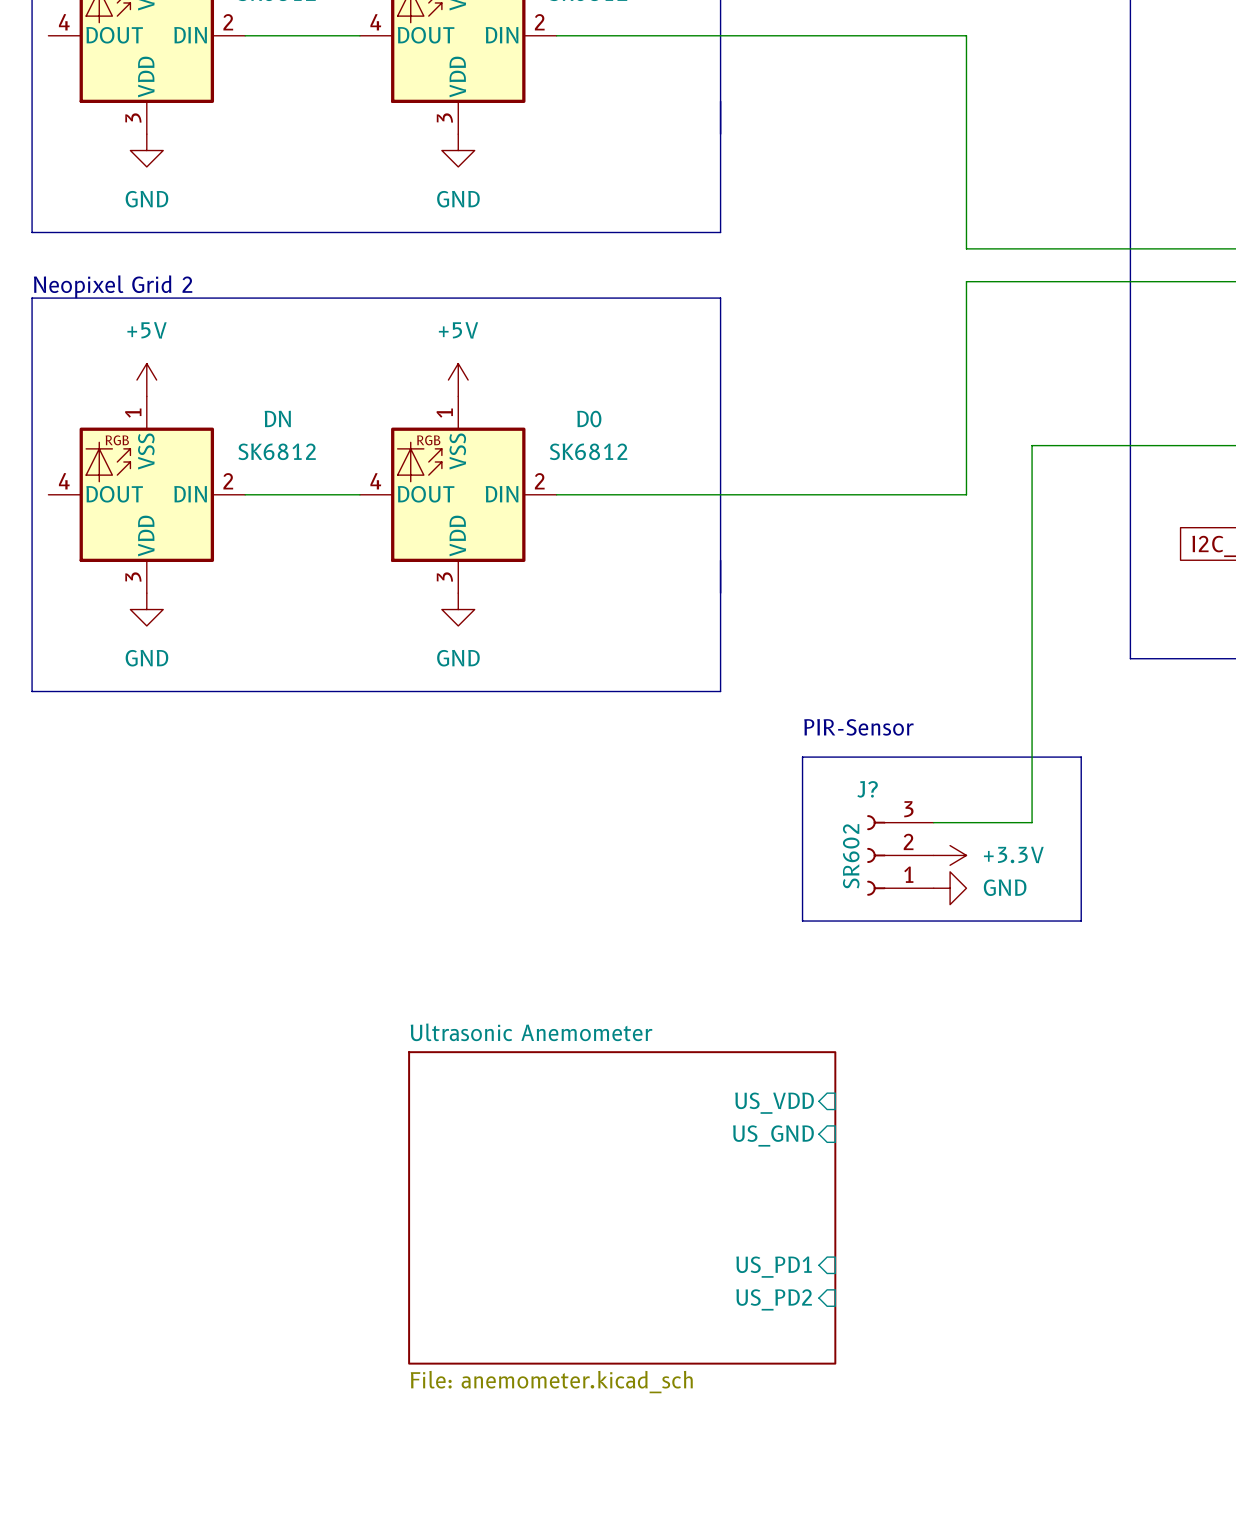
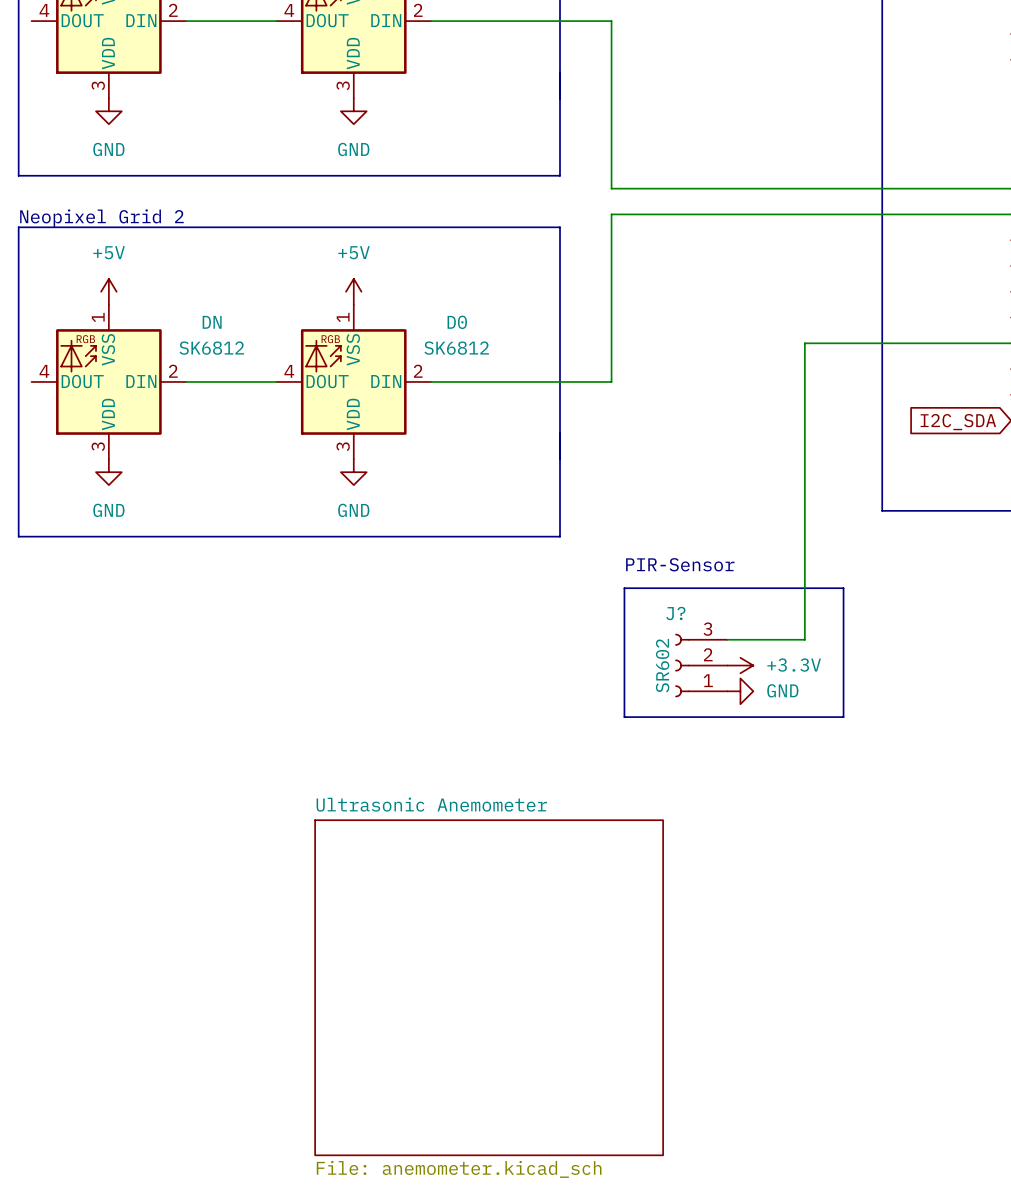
wire: (786, 35) (966, 35) (966, 248) -> (611, 21) (611, 188) (753, 188)
wire: (966, 281) (966, 494) (786, 494) -> (753, 214) (611, 214) (611, 381)
sheet pin: US_VDD (774, 1103) -> none
sheet pin: US_GND (773, 1135) -> none
sheet Ultrasonic Anemometer: File: anemometer.kicad_sch (622, 1207) -> none
sheet Ultrasonic Anemometer: none -> File: anemometer.kicad_sch (489, 987)
sheet pin: US_PD1 (774, 1267) -> none
sheet pin: US_PD2 (774, 1299) -> none

